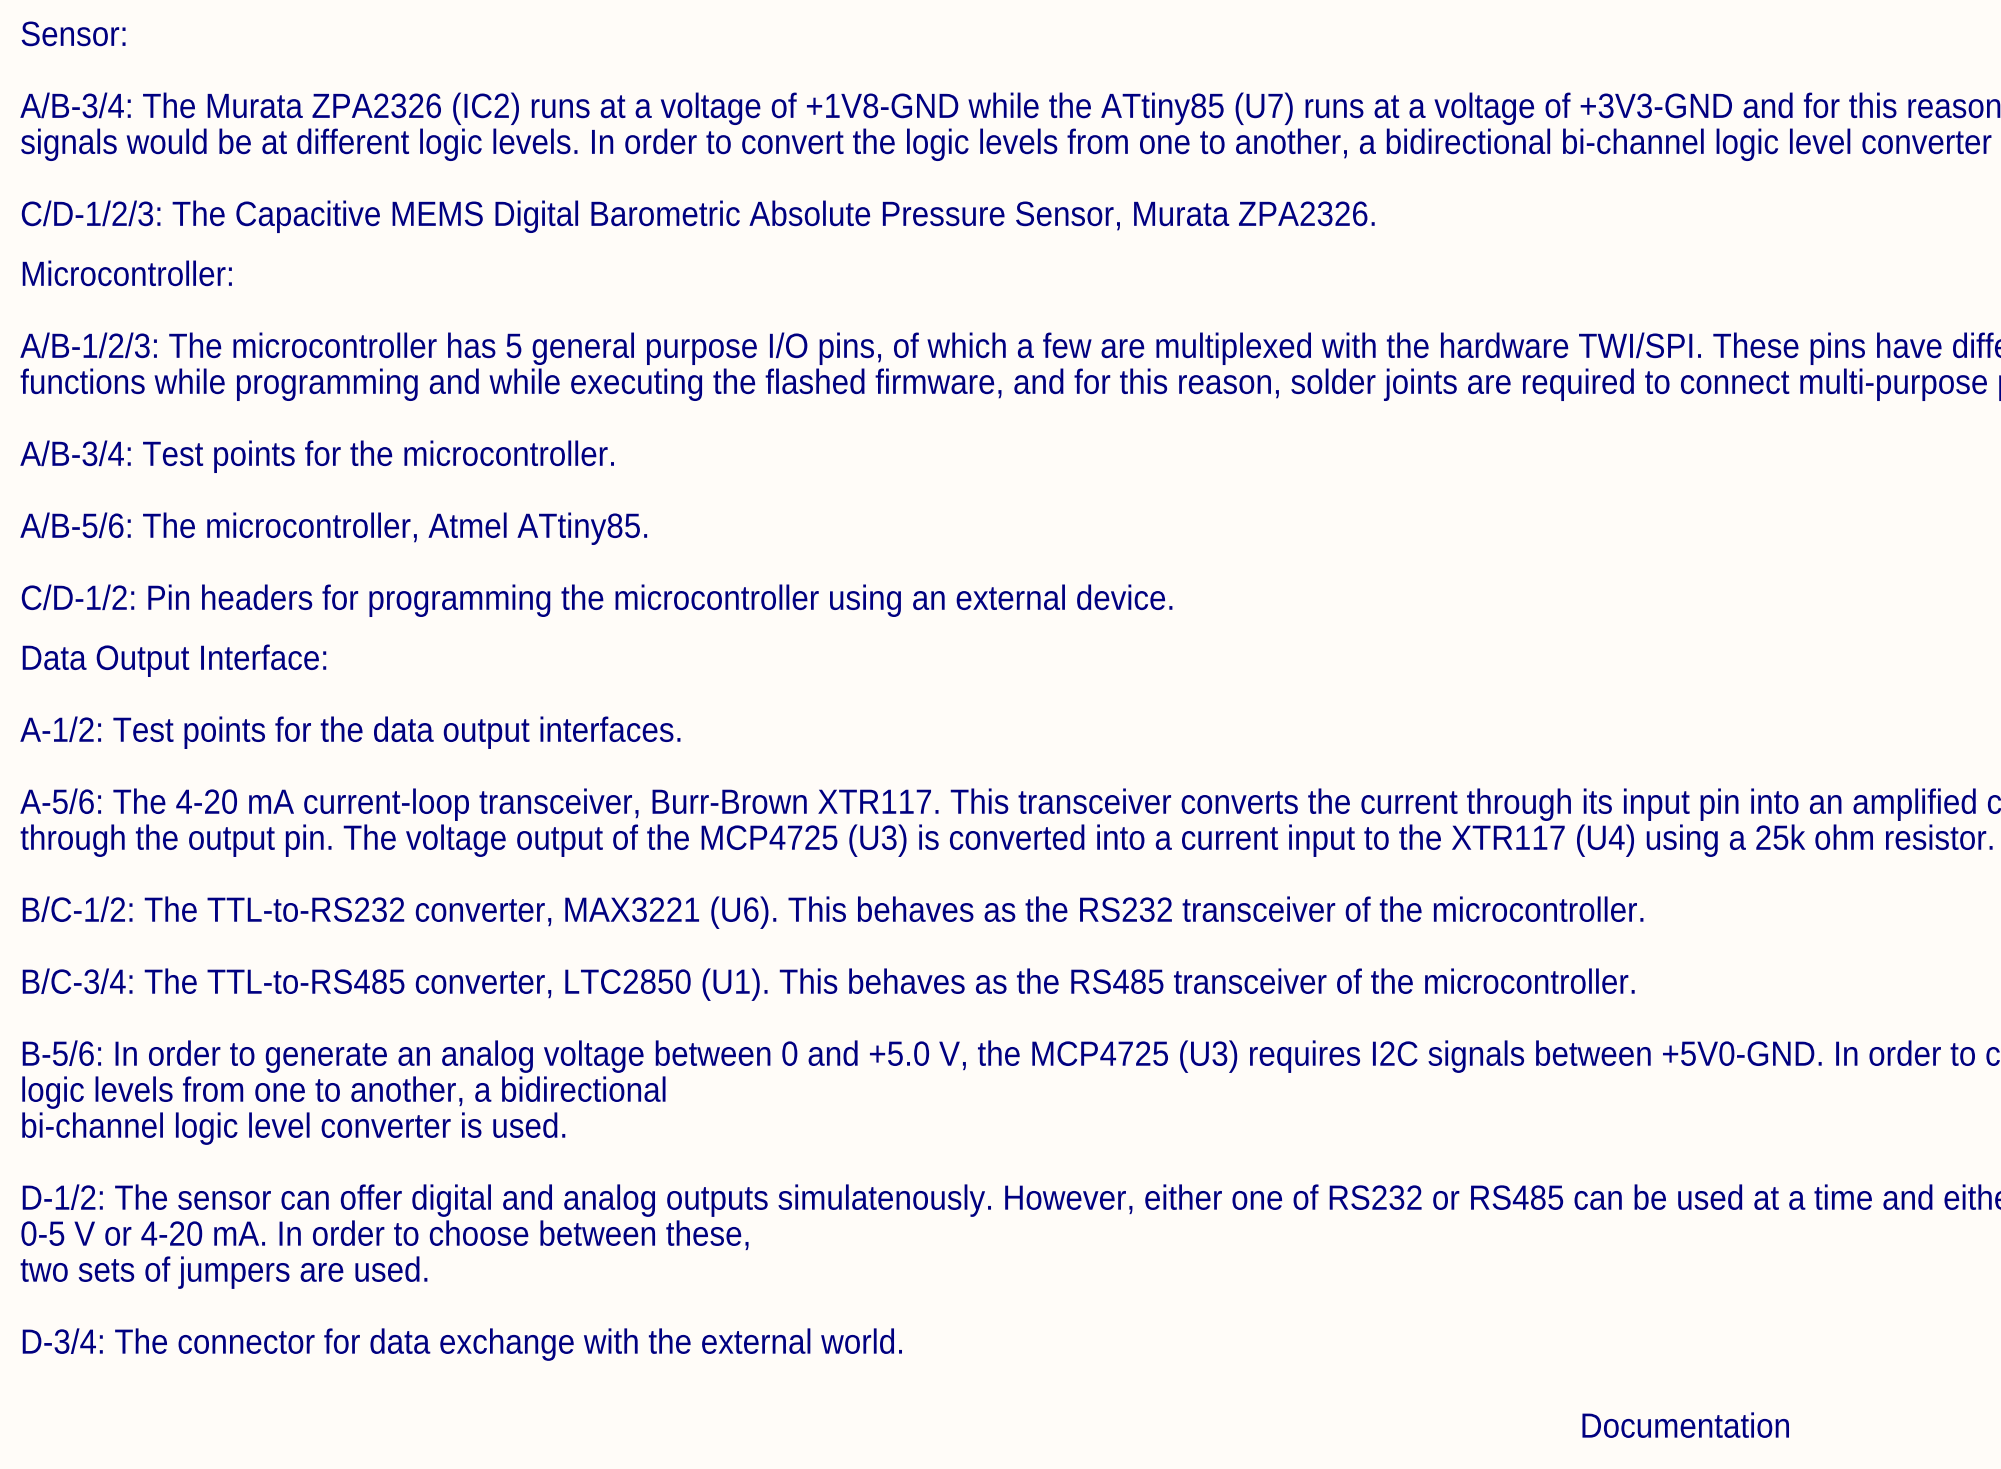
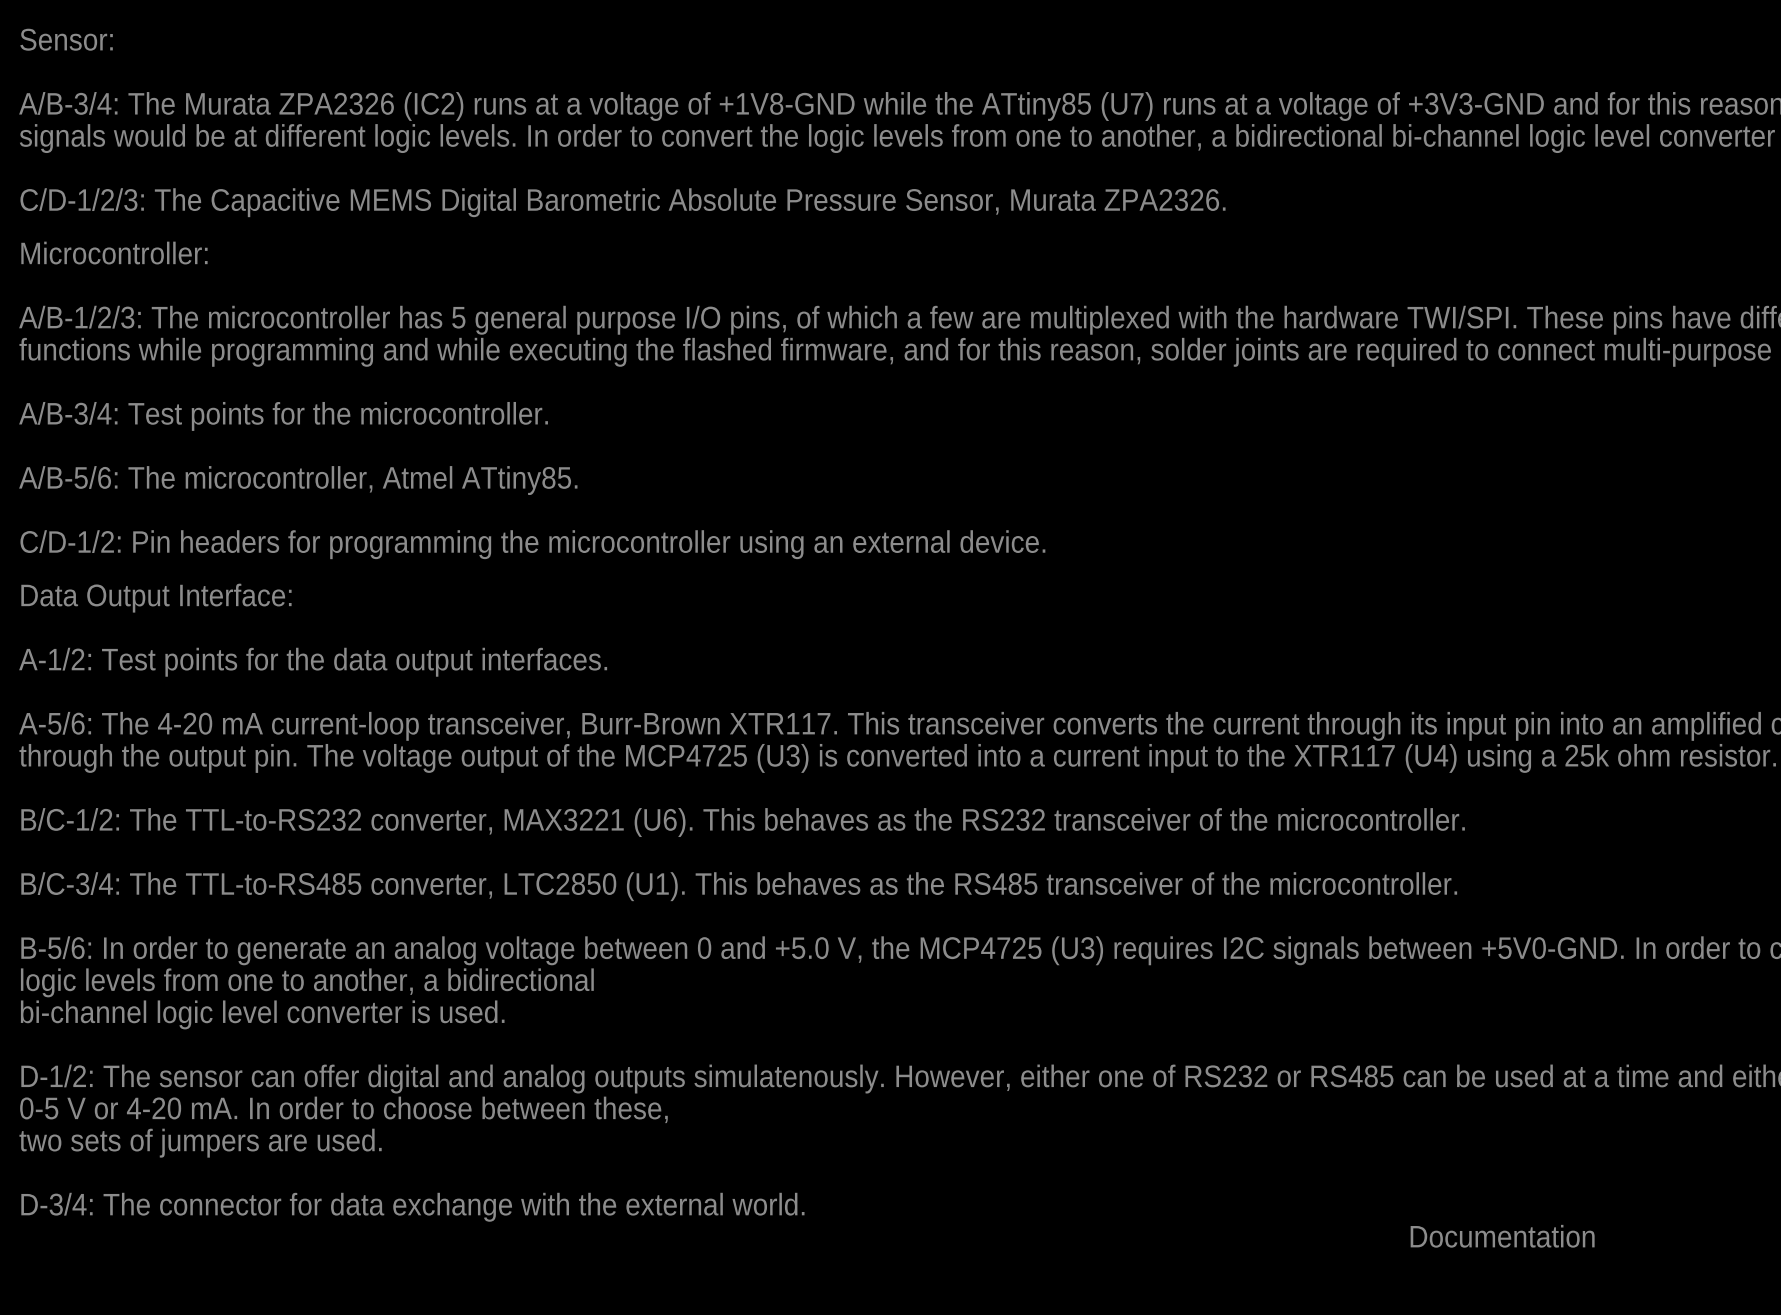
text position: Documentation (1685, 1425) -> Documentation (1502, 1236)

